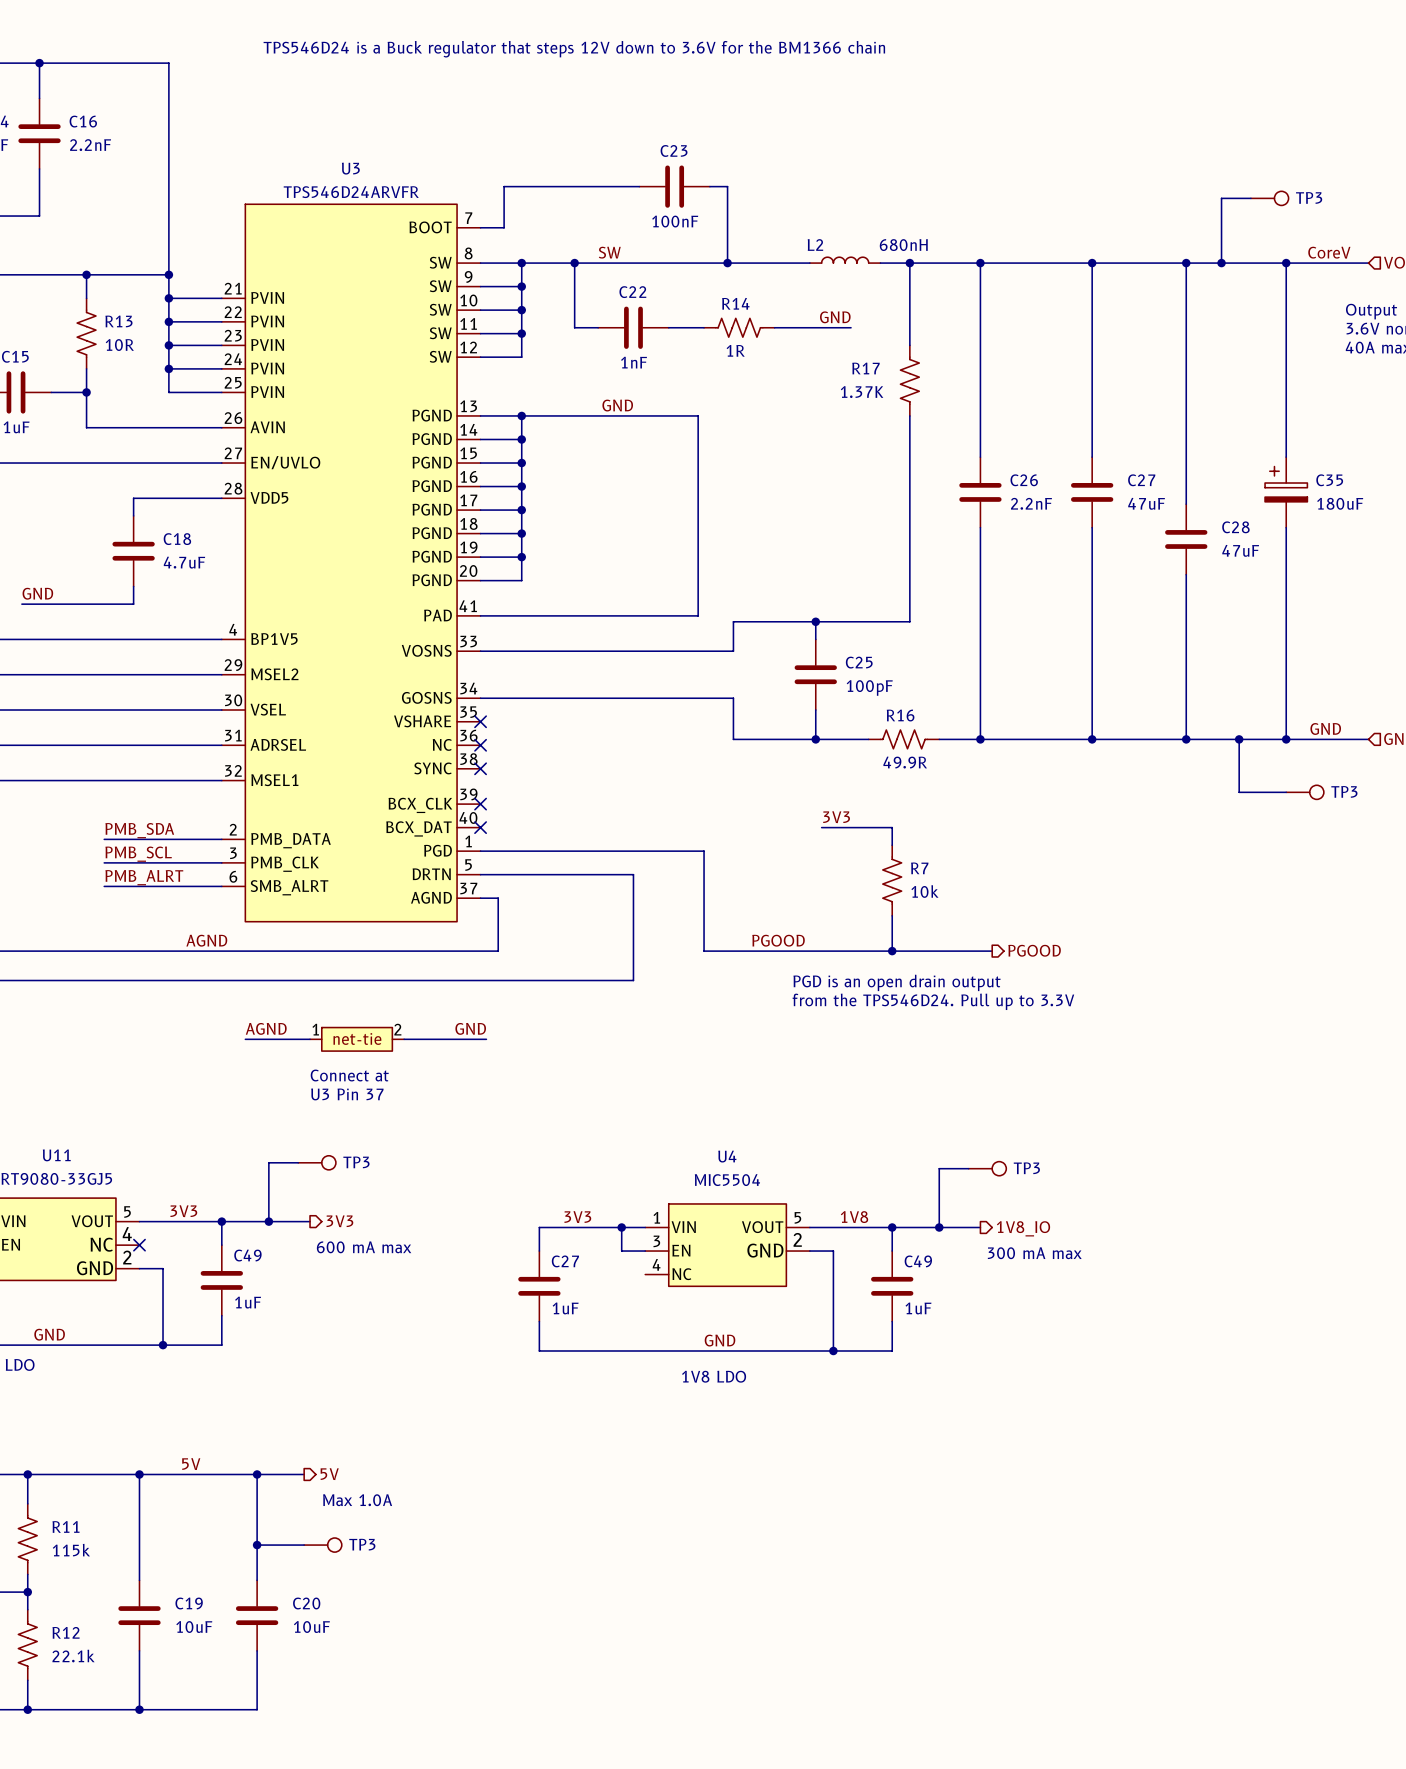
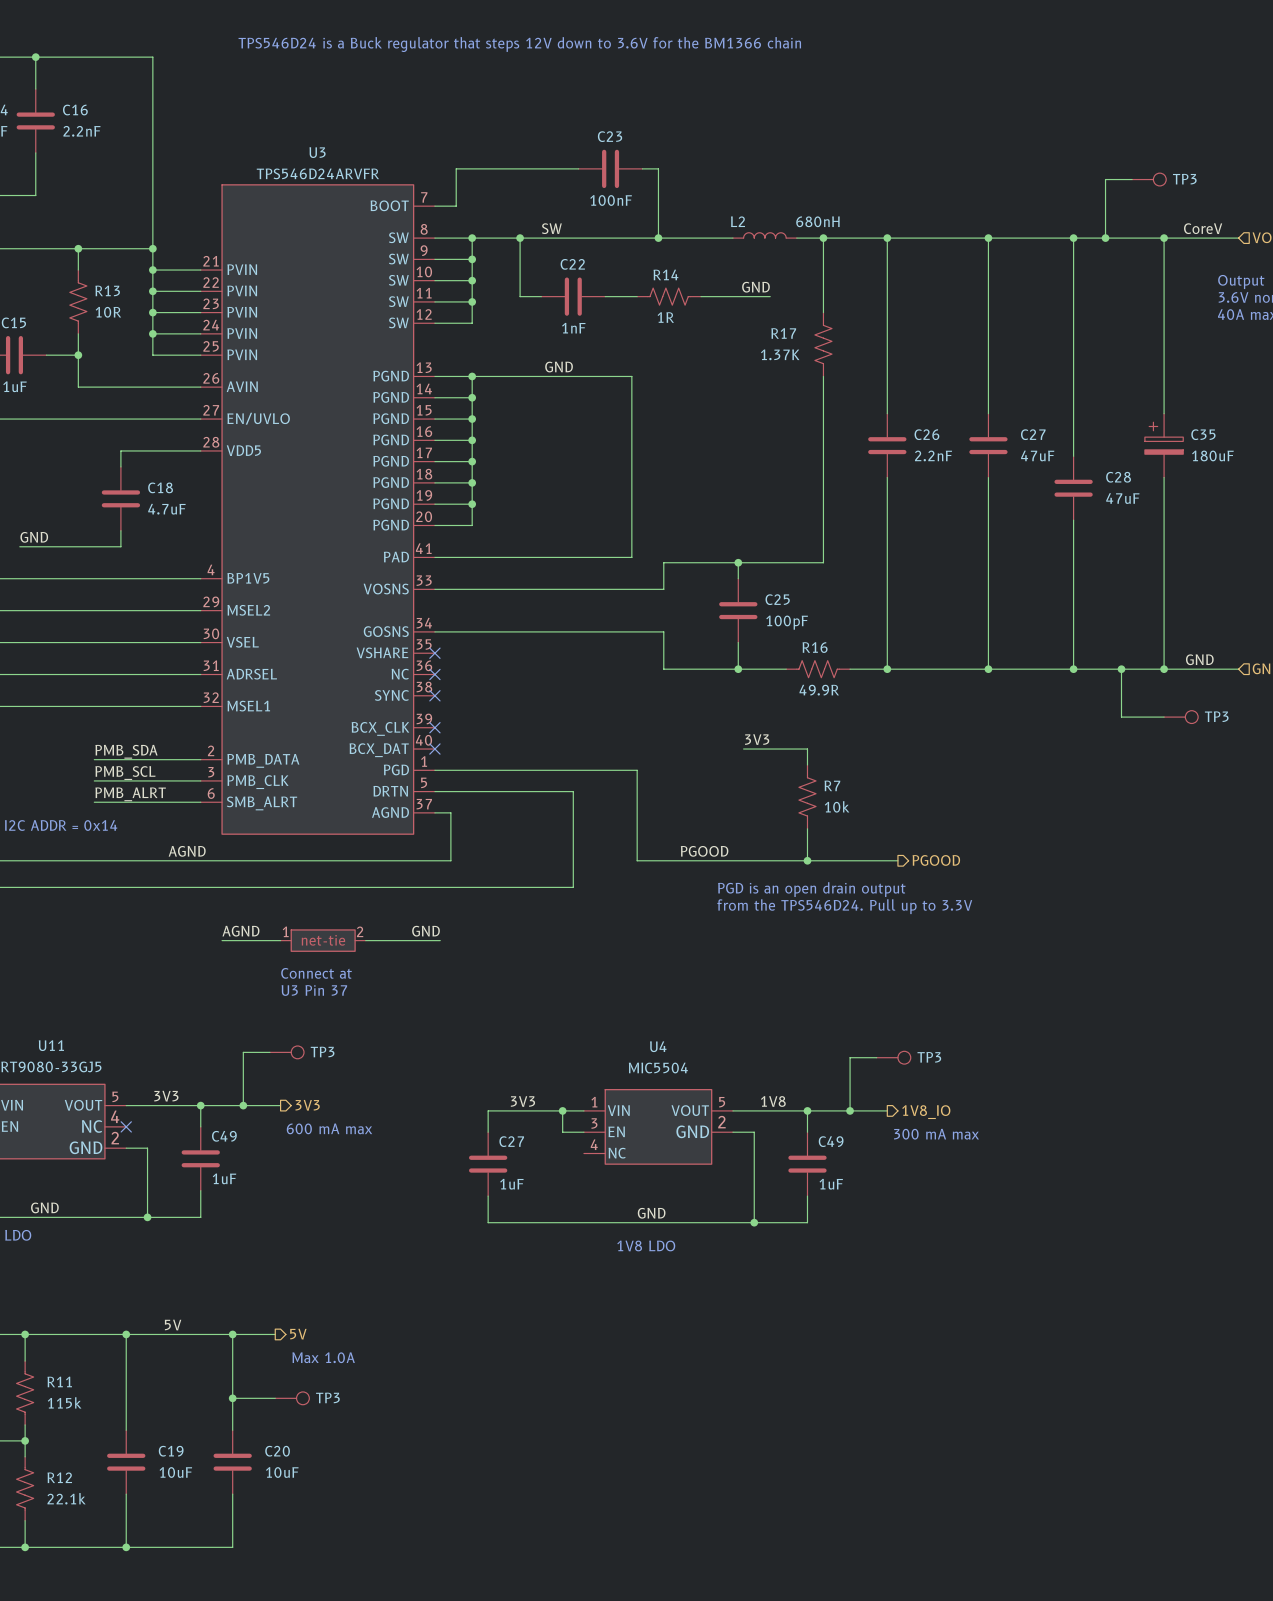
text: none -> I2C ADDR = 0x14 (61, 825)

